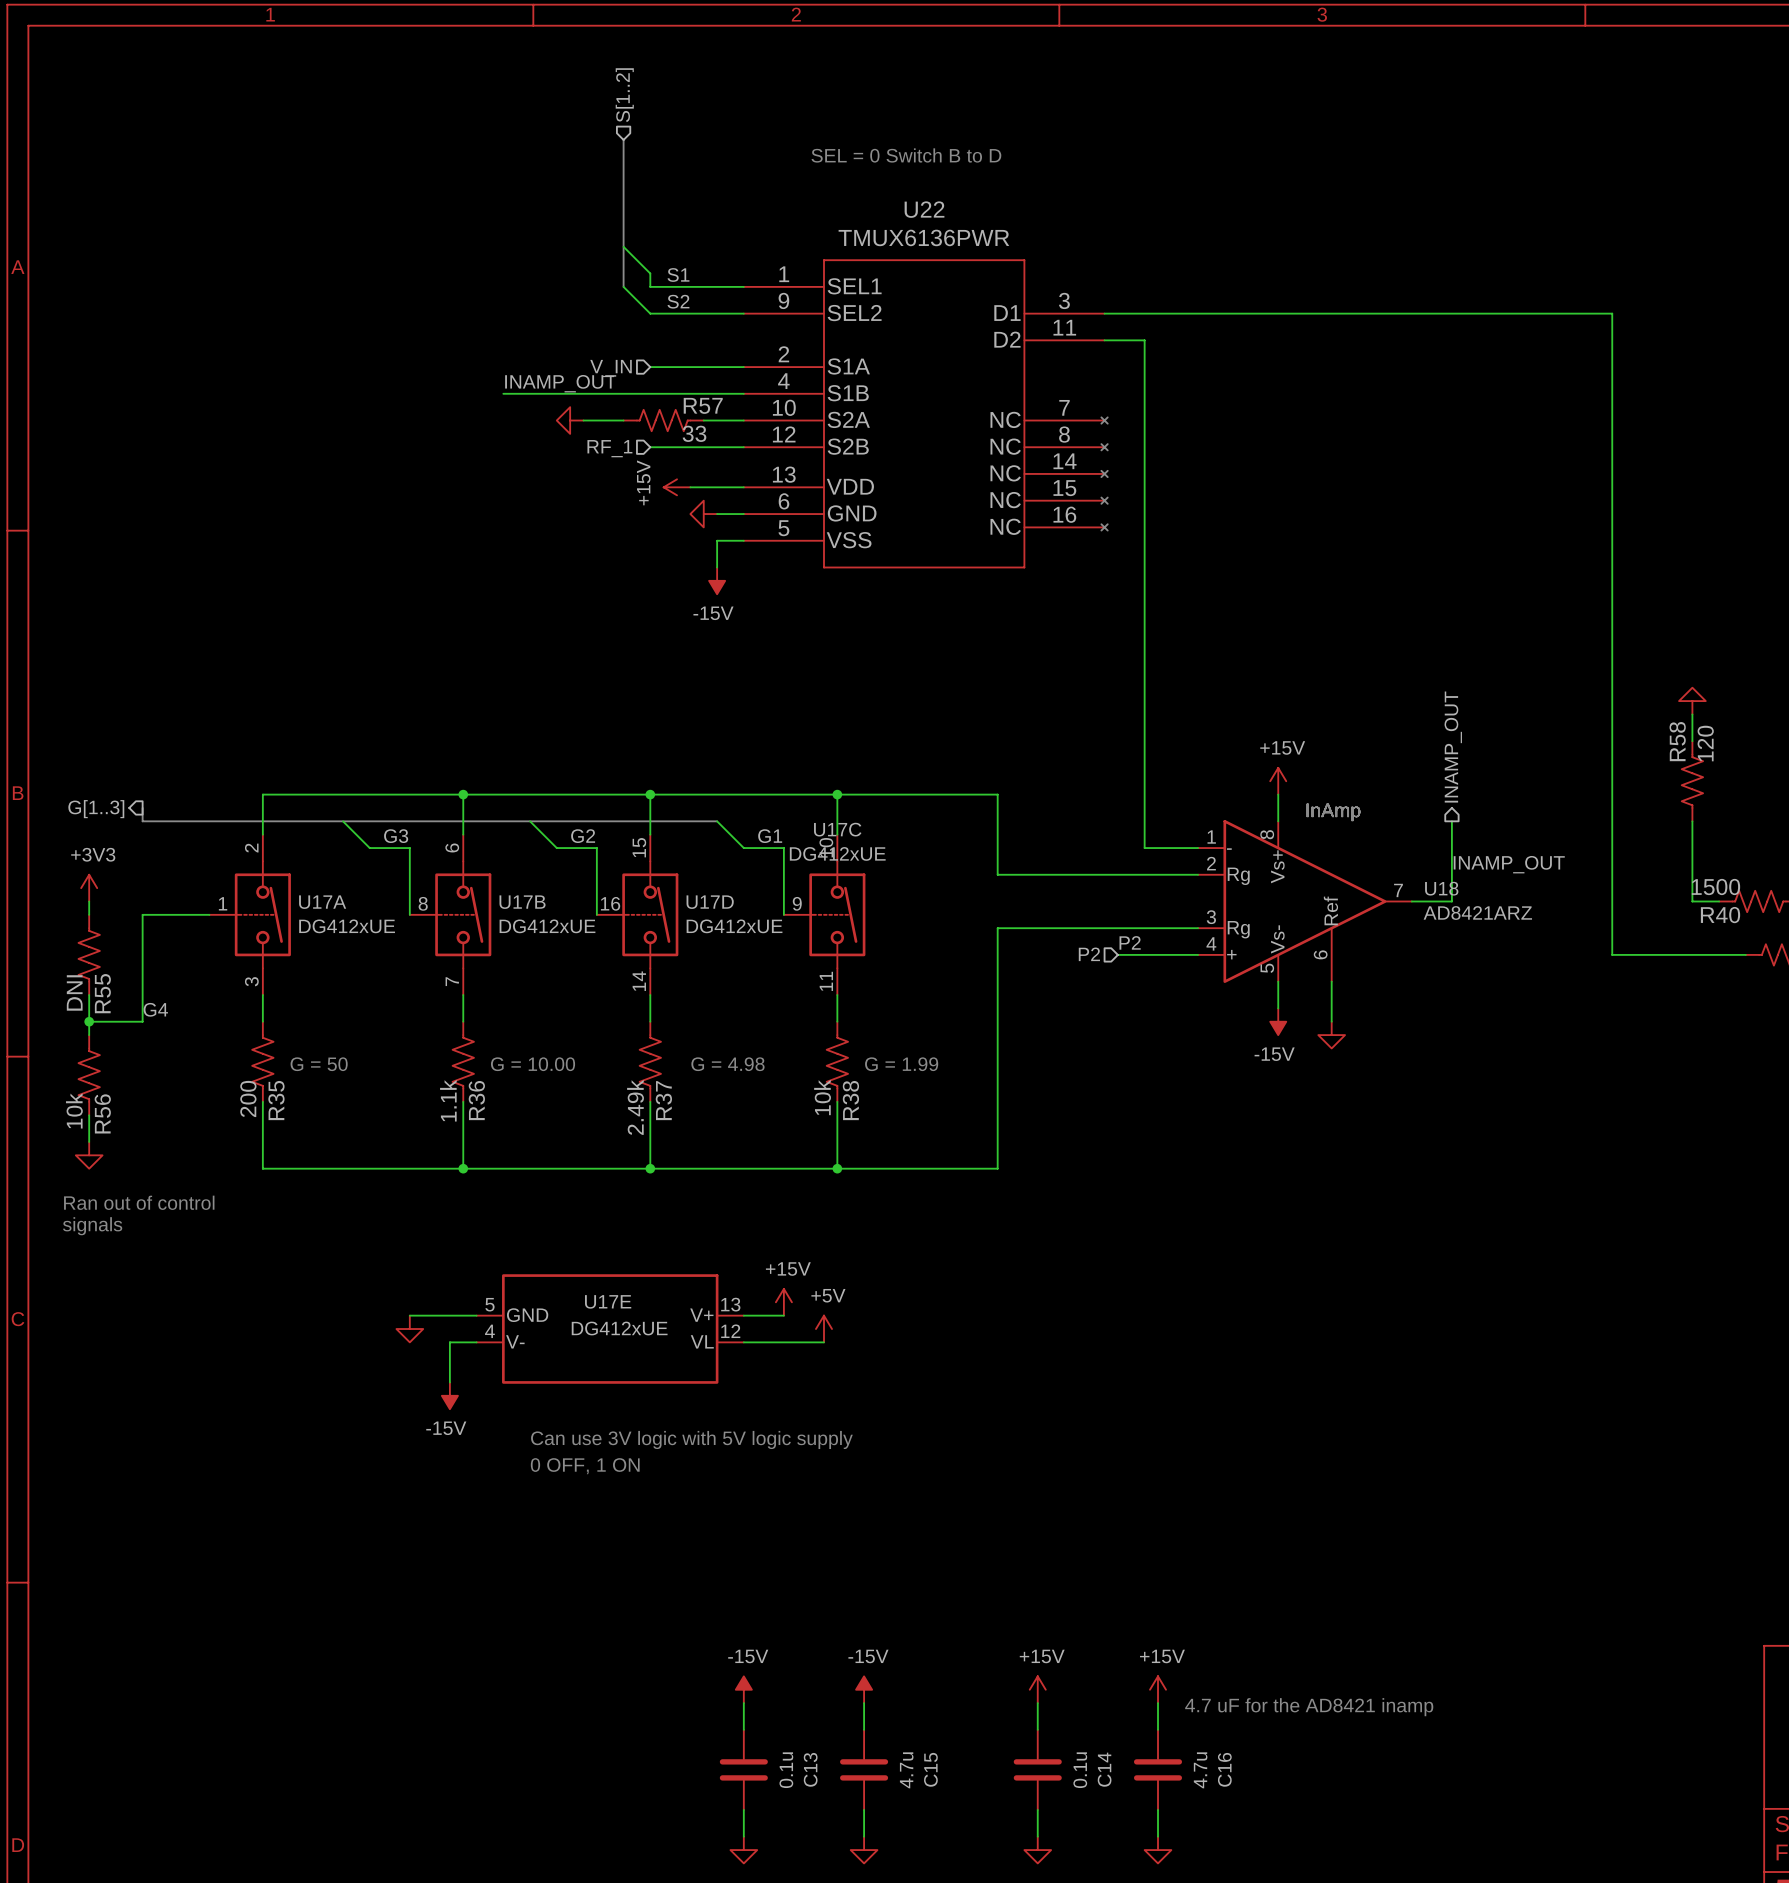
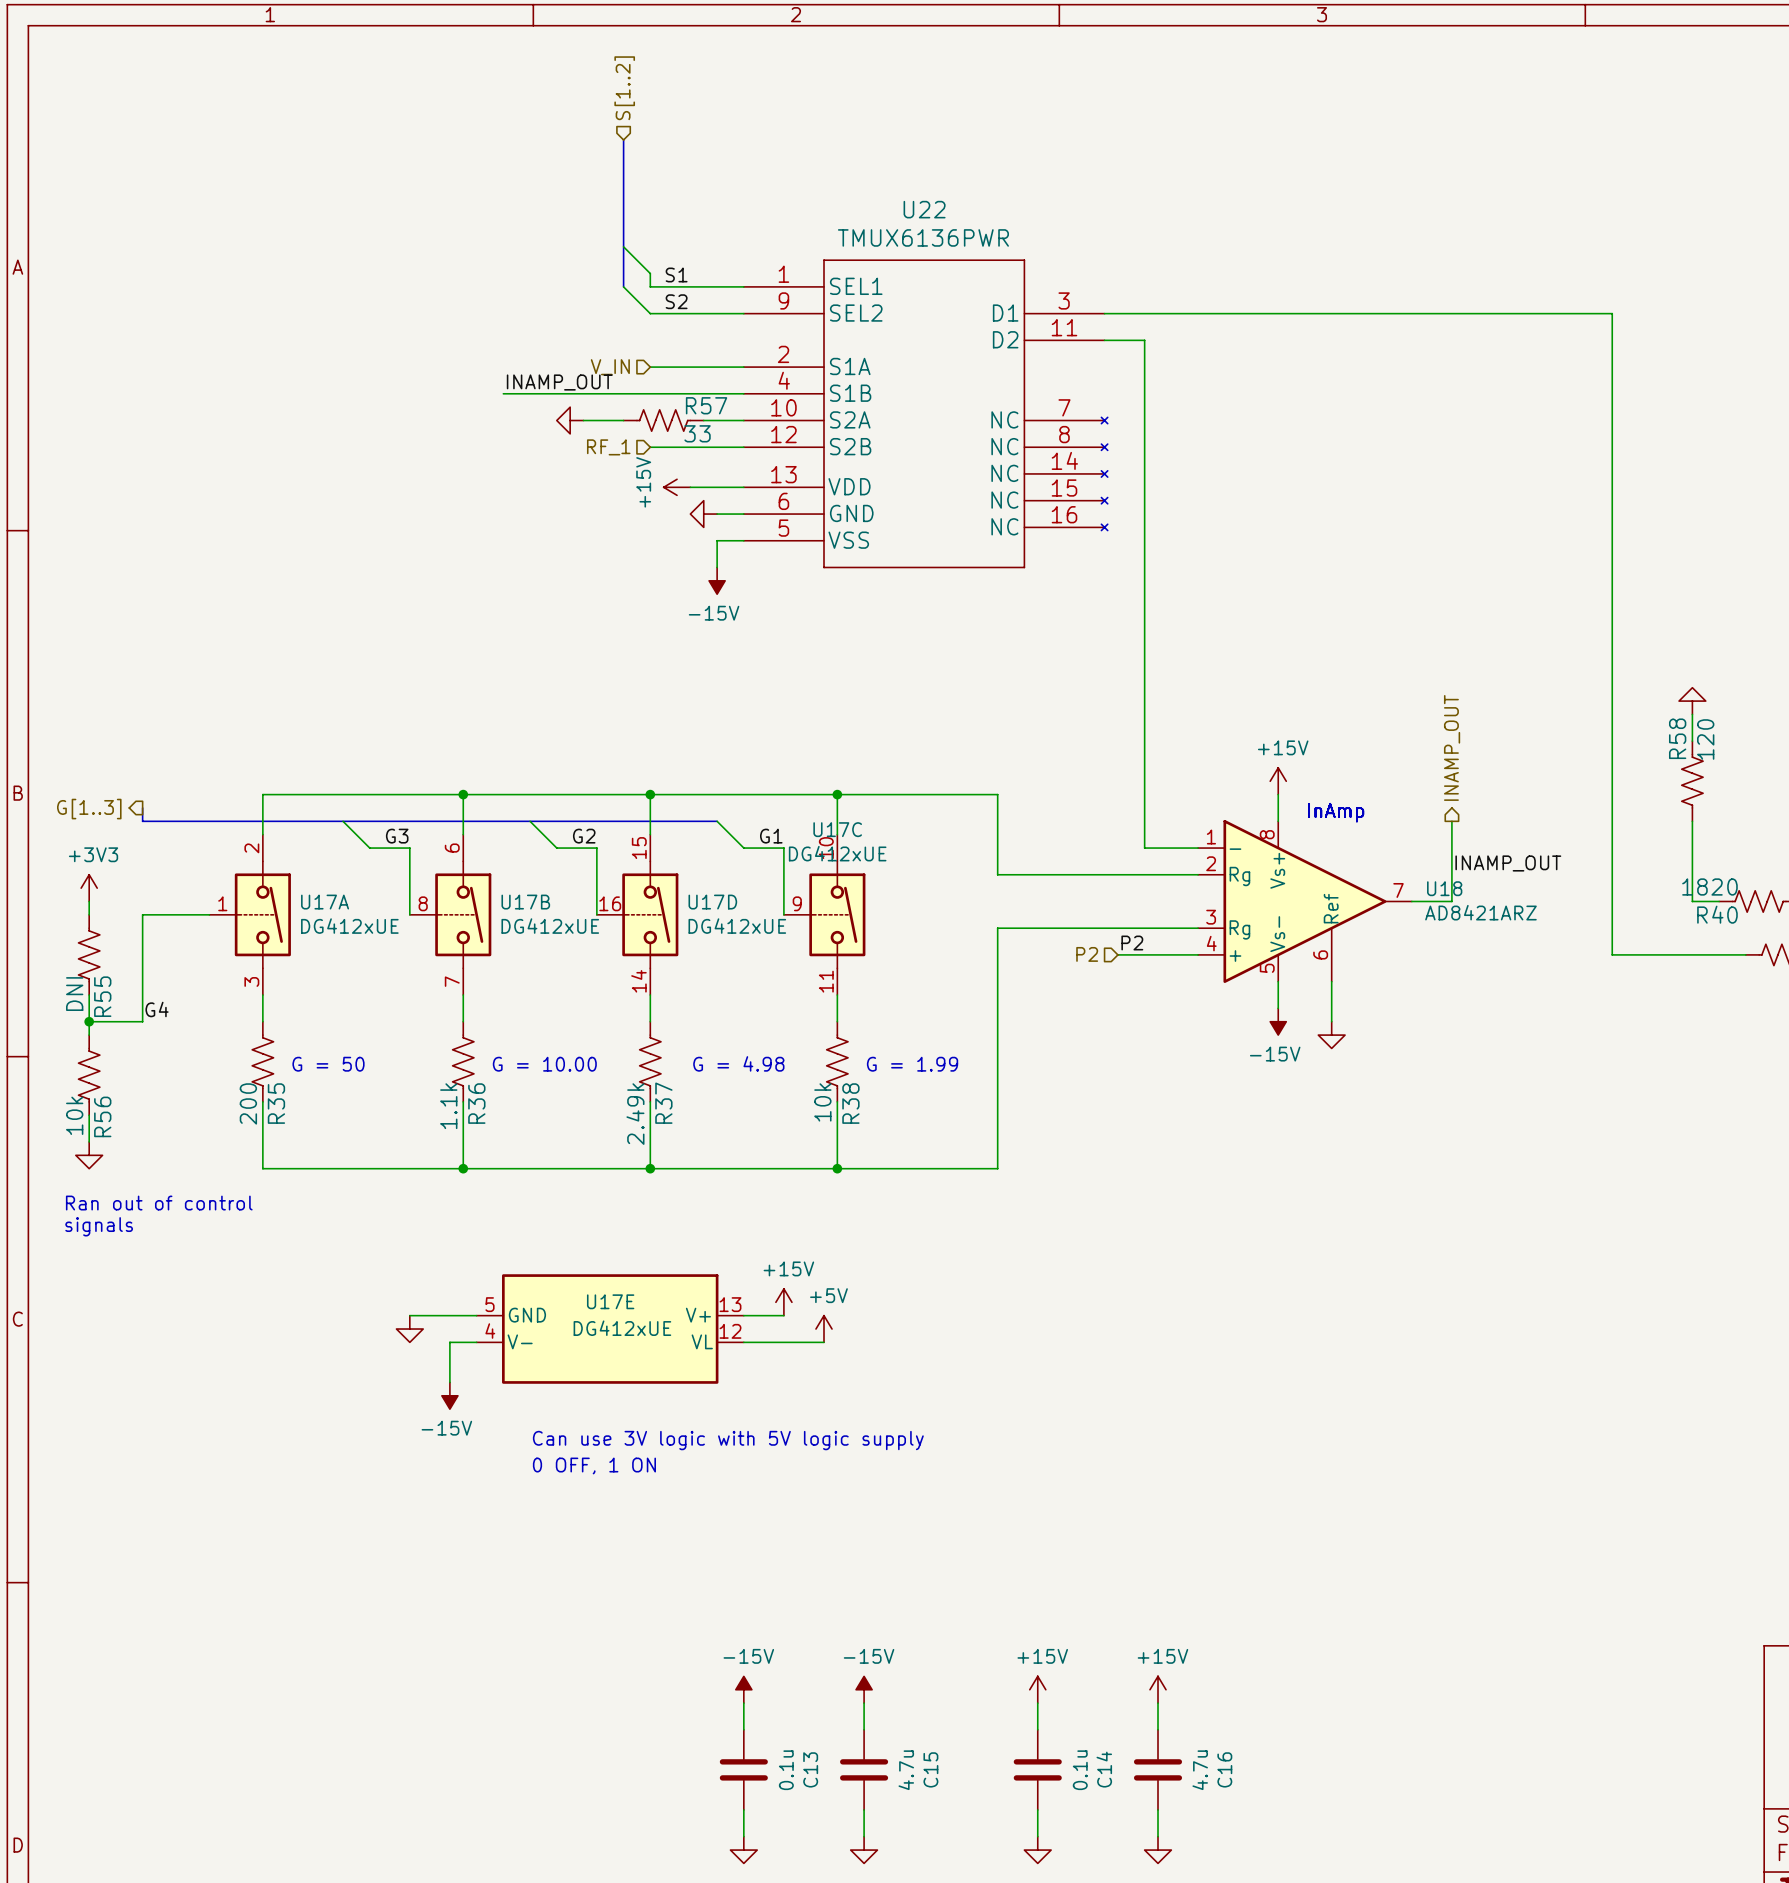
text: SEL = 0 Switch B to D (906, 155) -> none
R40 value: 1500 (1715, 886) -> 1820 (1709, 887)
text: 4.7 uF for the AD8421 inamp (1309, 1707) -> none

